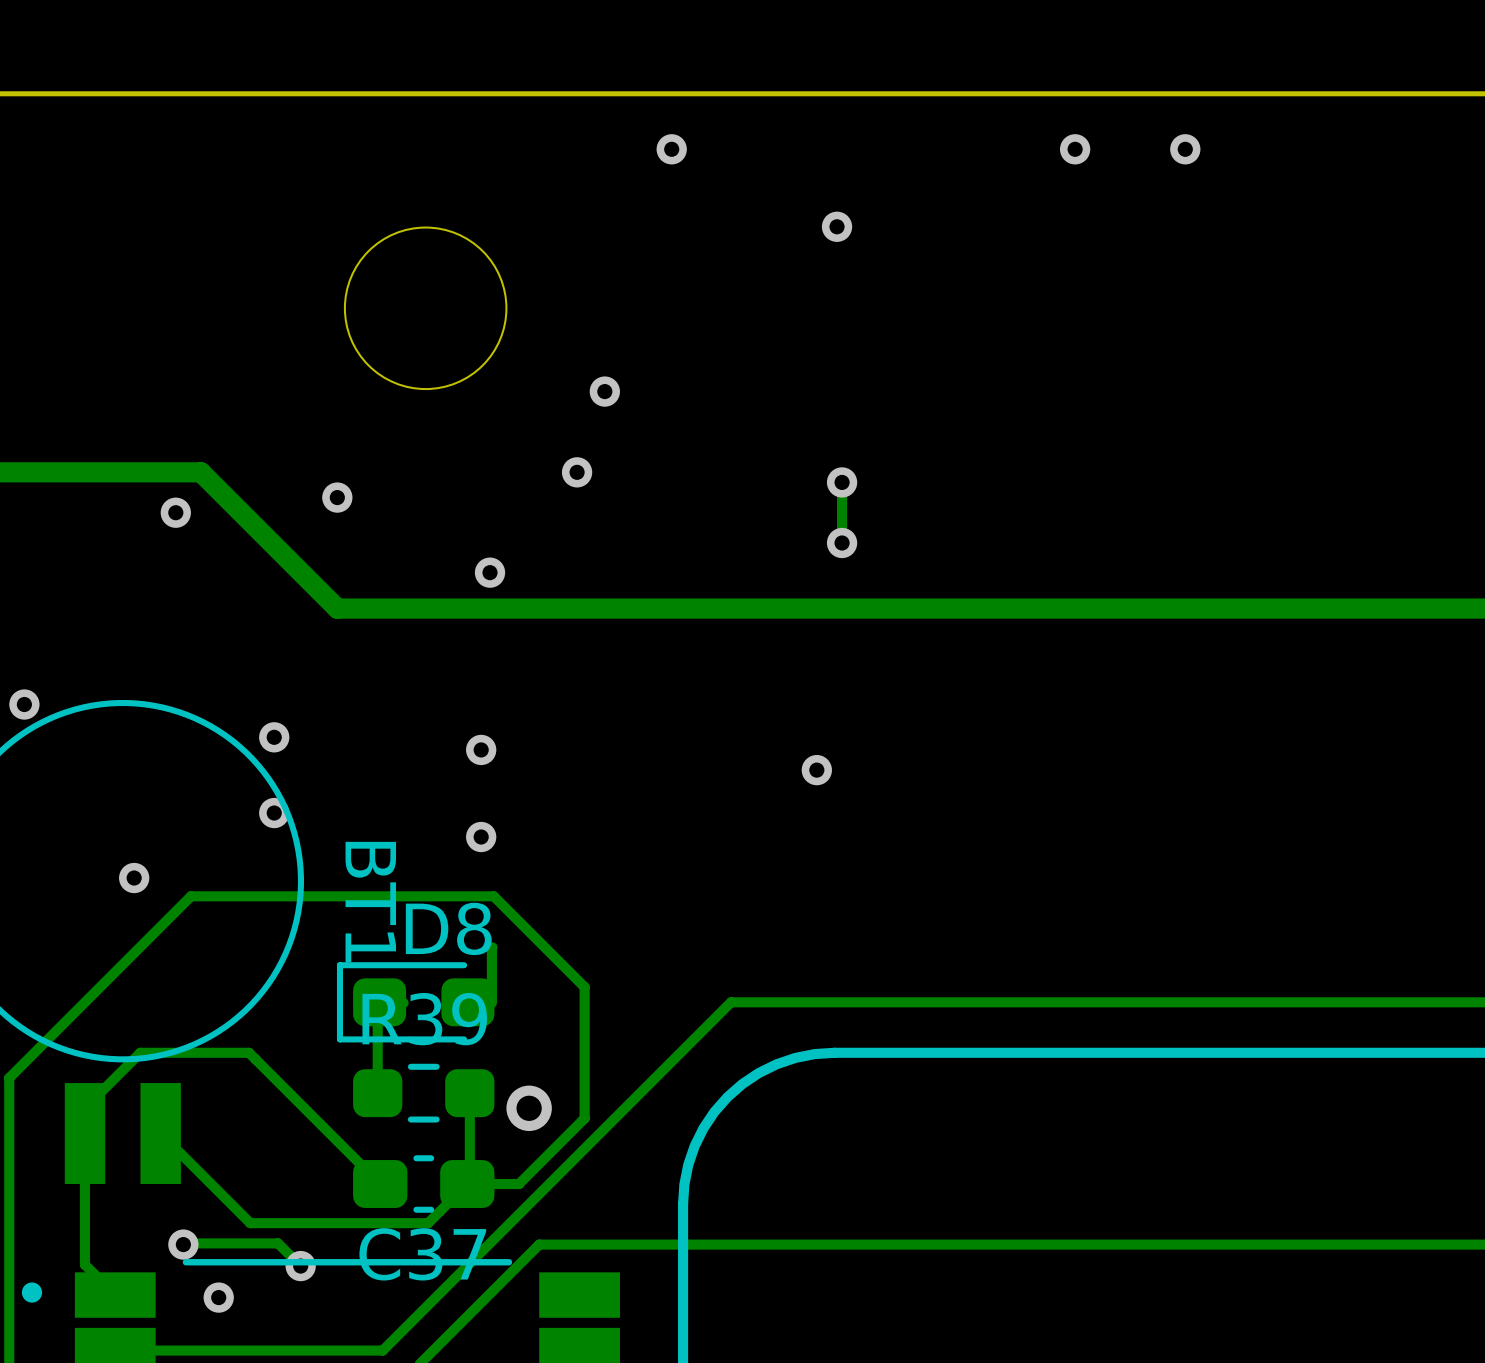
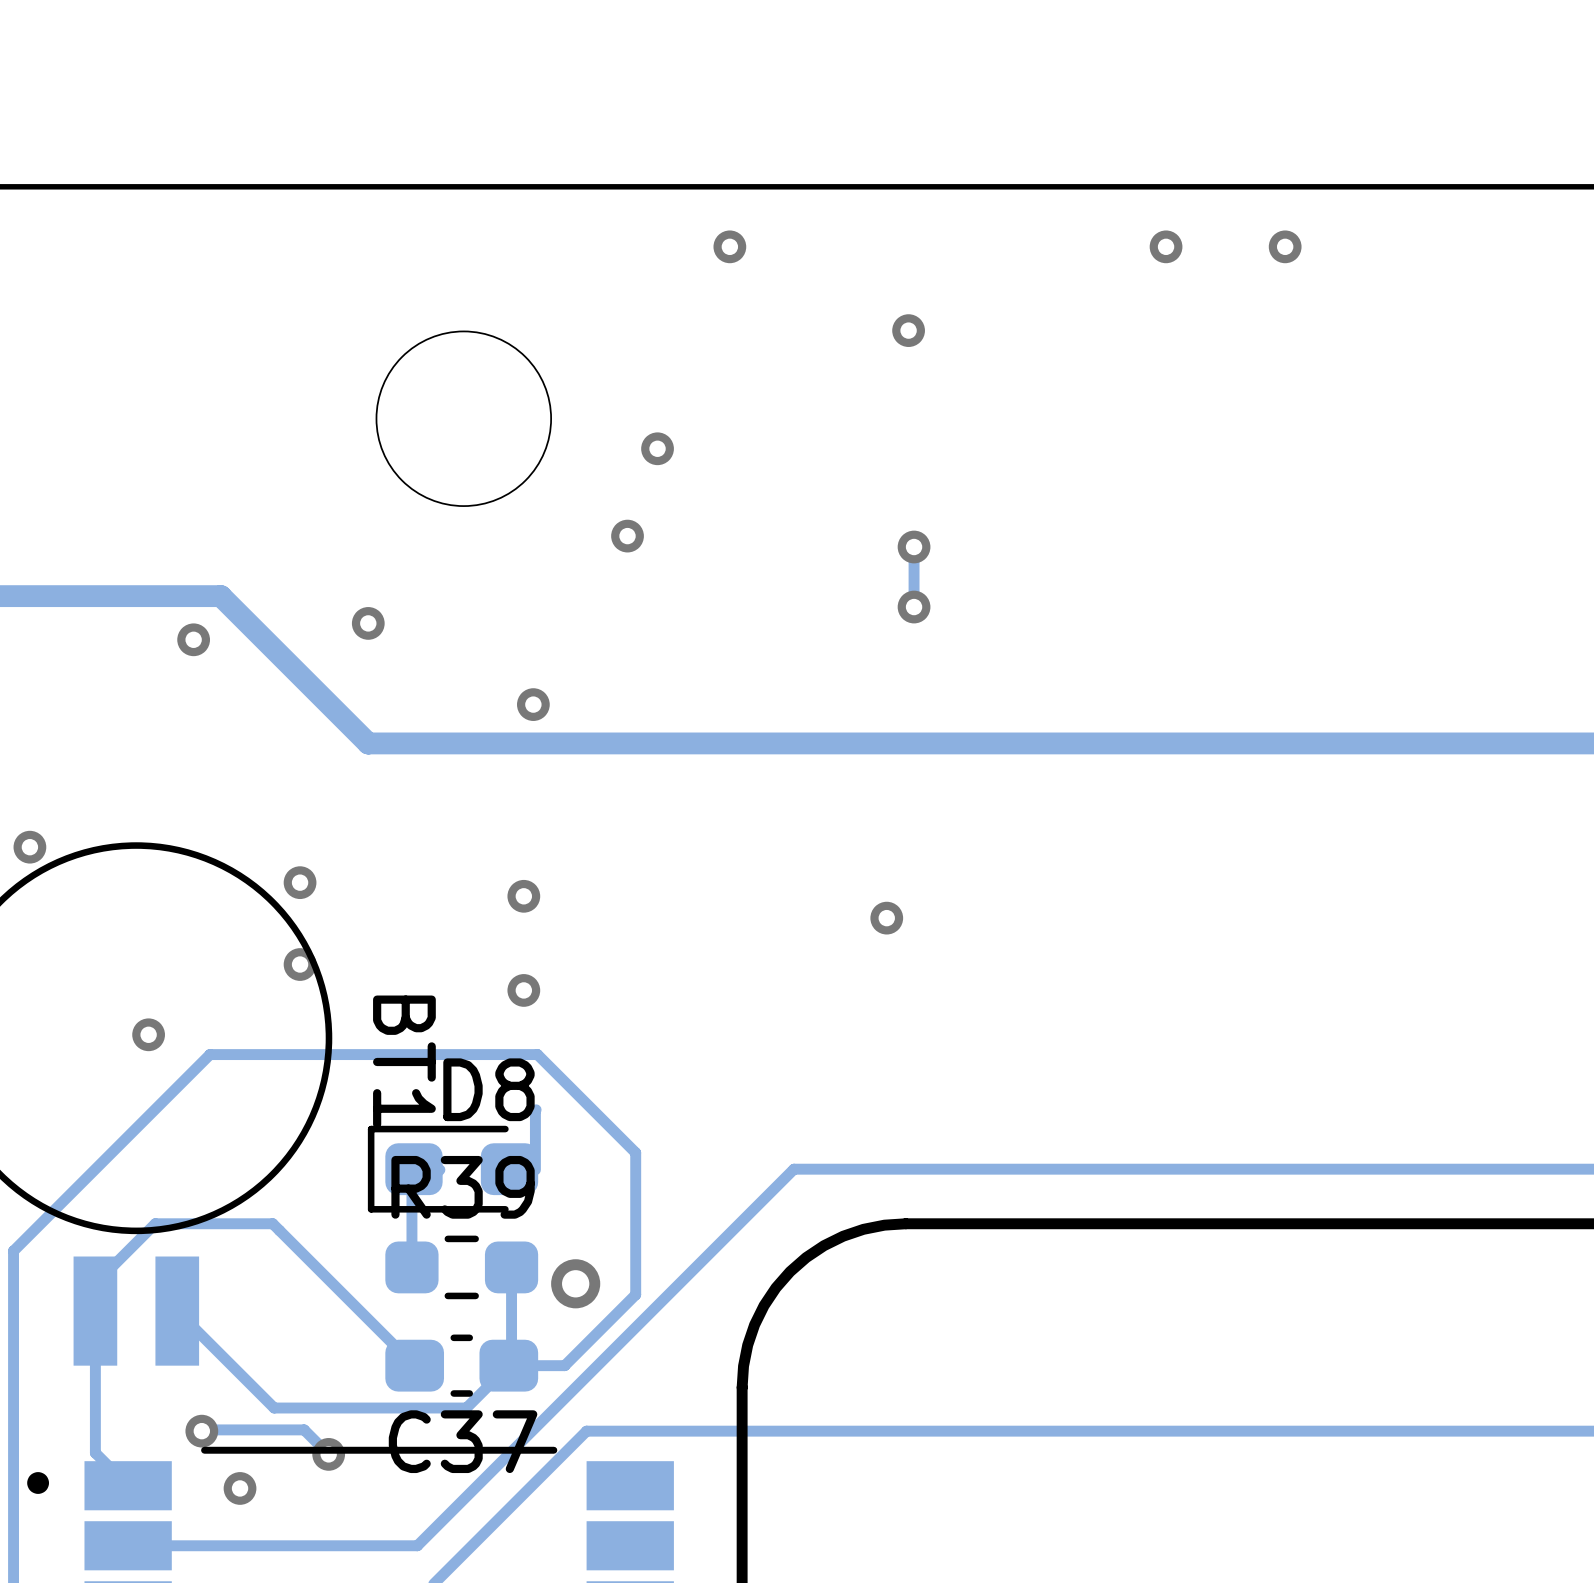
via: none -> (657, 448)
via position: (604, 391) -> (627, 536)
via: (577, 472) -> none
track: (842, 487) (842, 543) -> (914, 547) (914, 607)
via position: (842, 543) -> (914, 547)

